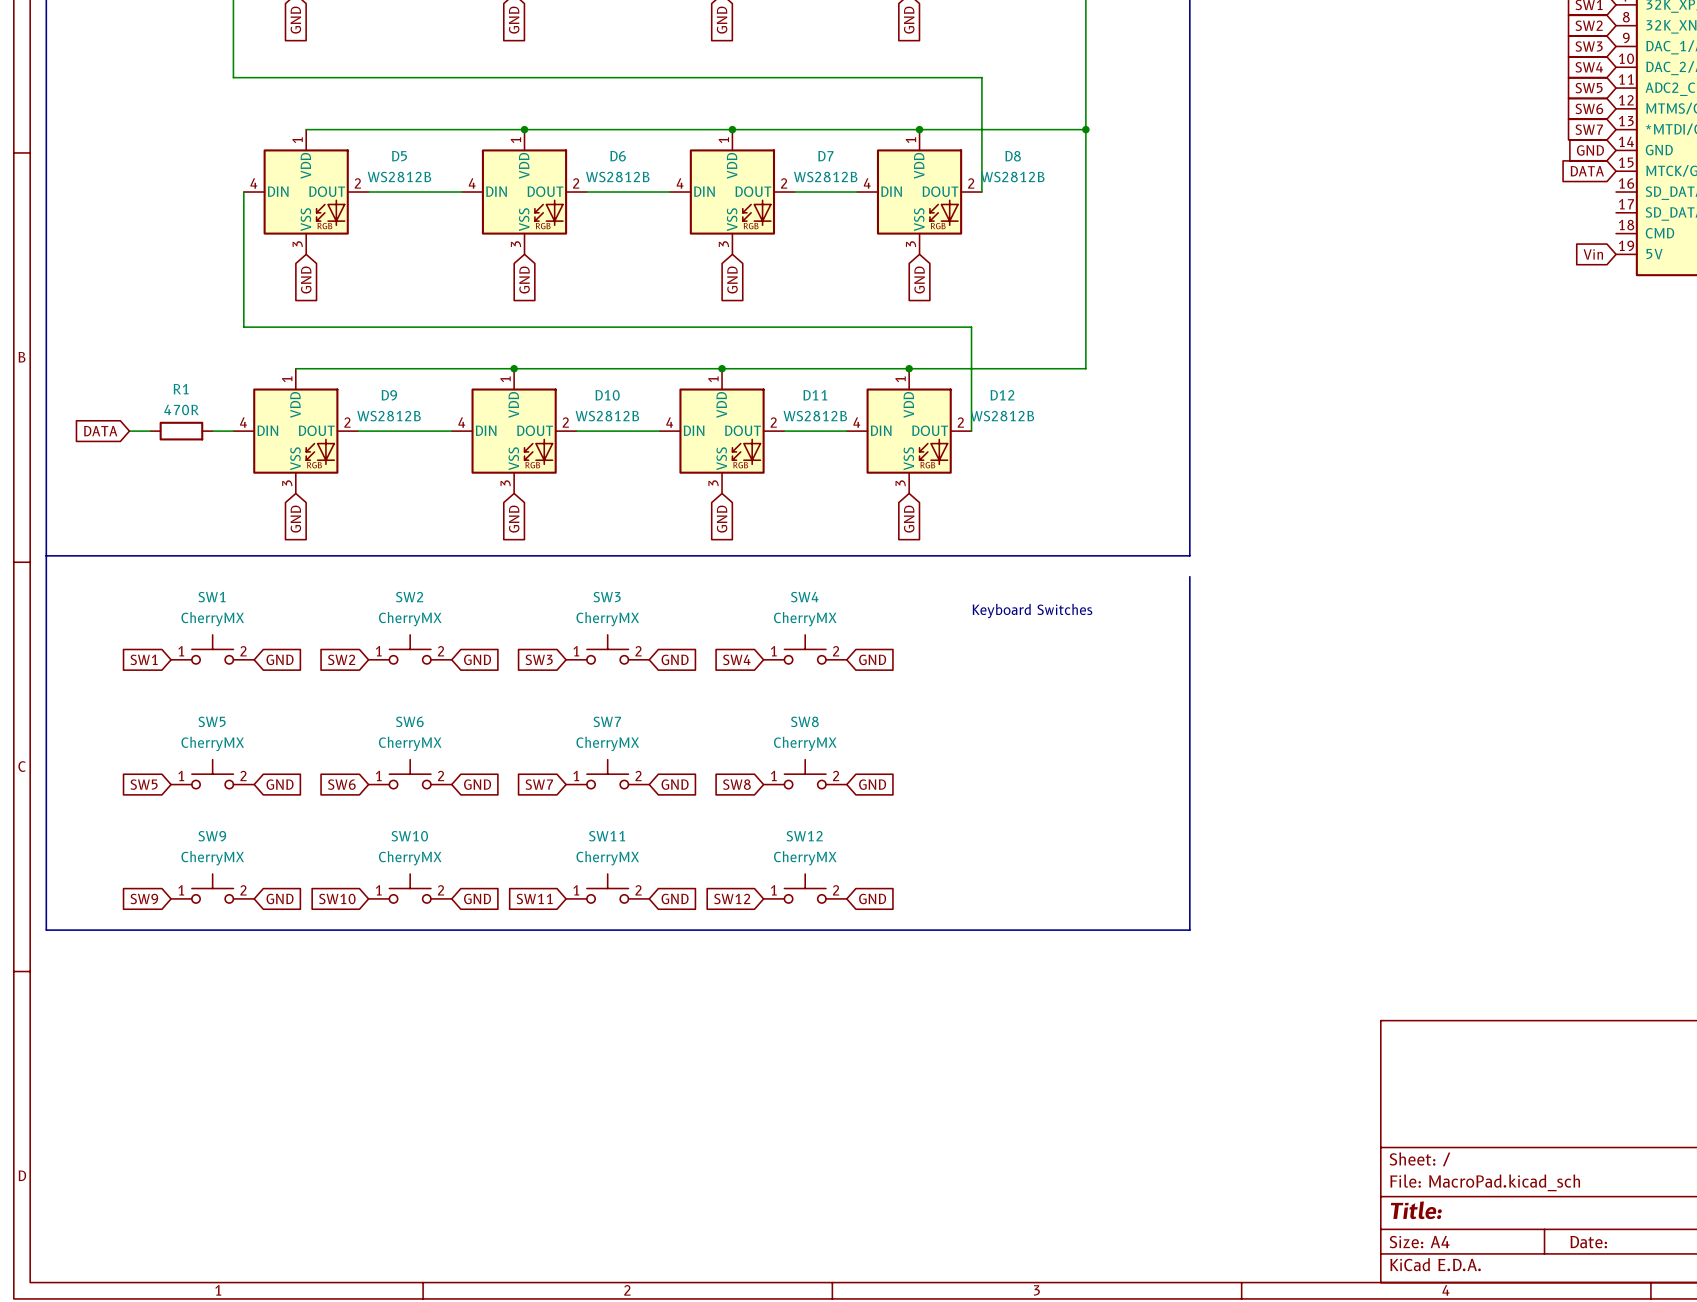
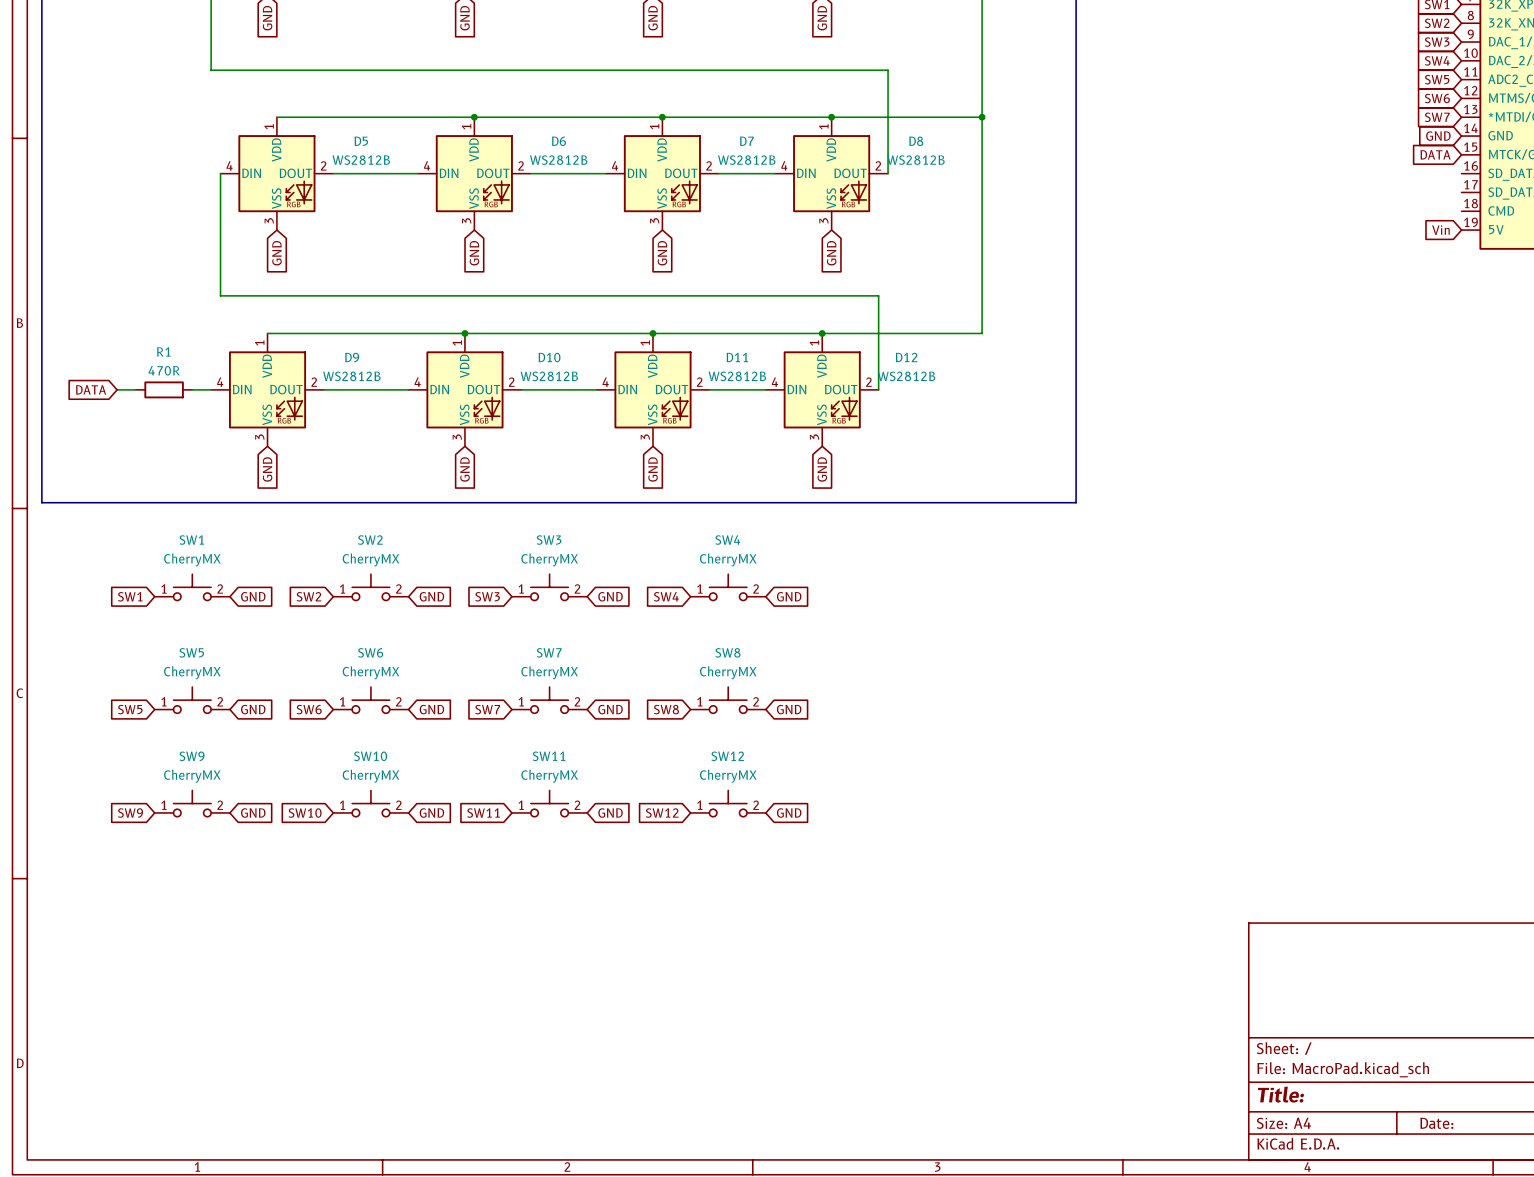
line: (46, 555) (46, 930) (1189, 930) (1189, 576) -> none
text: Keyboard Switches (1032, 611) -> none

